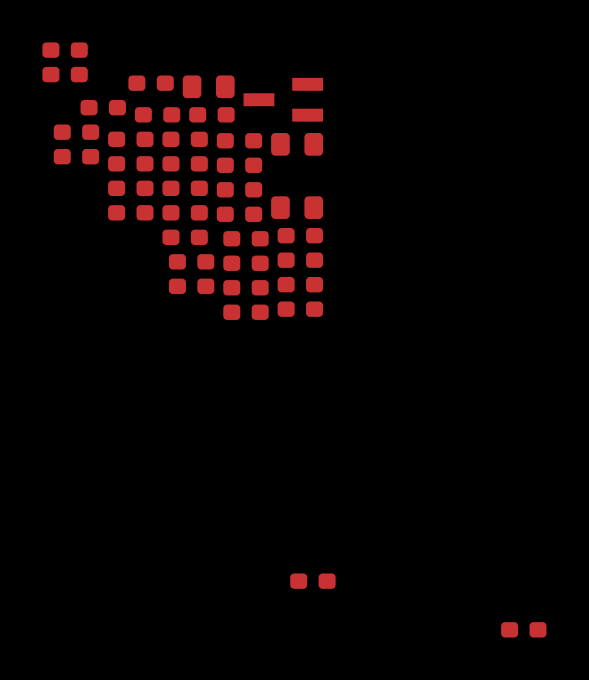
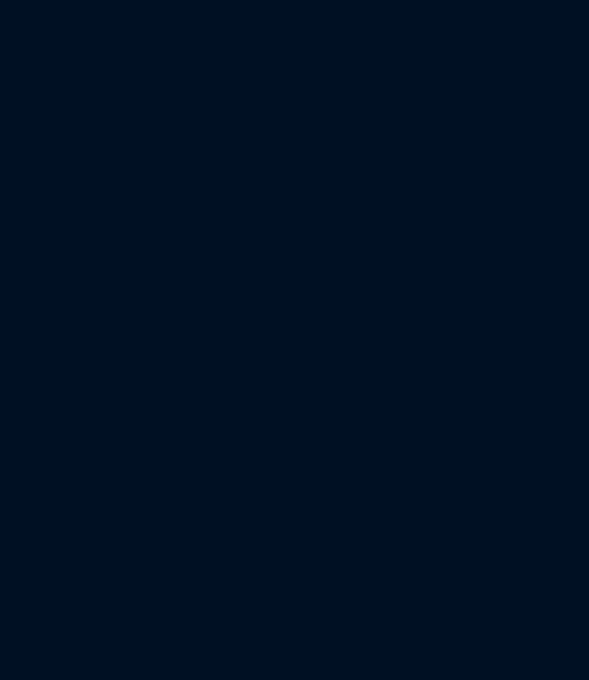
part: (65, 50) -> none
part: (65, 74) -> none
part: (151, 83) -> none
part: (208, 86) -> none
part: (283, 99) -> none
part: (103, 107) -> none
part: (157, 114) -> none
part: (211, 114) -> none
part: (76, 132) -> none
part: (130, 139) -> none
part: (185, 139) -> none
part: (239, 140) -> none
part: (297, 144) -> none
part: (76, 156) -> none
part: (130, 163) -> none
part: (185, 163) -> none
part: (239, 165) -> none
part: (130, 188) -> none
part: (185, 188) -> none
part: (239, 189) -> none
part: (297, 207) -> none
part: (130, 212) -> none
part: (185, 212) -> none
part: (239, 214) -> none
part: (300, 235) -> none
part: (185, 237) -> none
part: (245, 238) -> none
part: (300, 260) -> none
part: (191, 261) -> none
part: (245, 263) -> none
part: (300, 284) -> none
part: (191, 286) -> none
part: (245, 287) -> none
part: (300, 309) -> none
part: (245, 312) -> none
part: (312, 581) -> none
part: (523, 629) -> none

